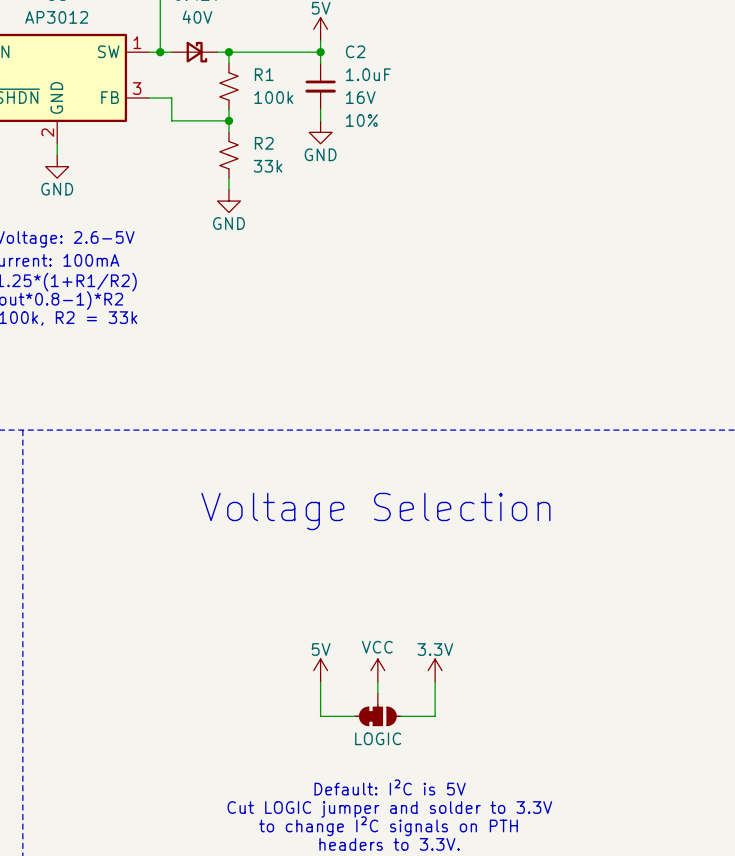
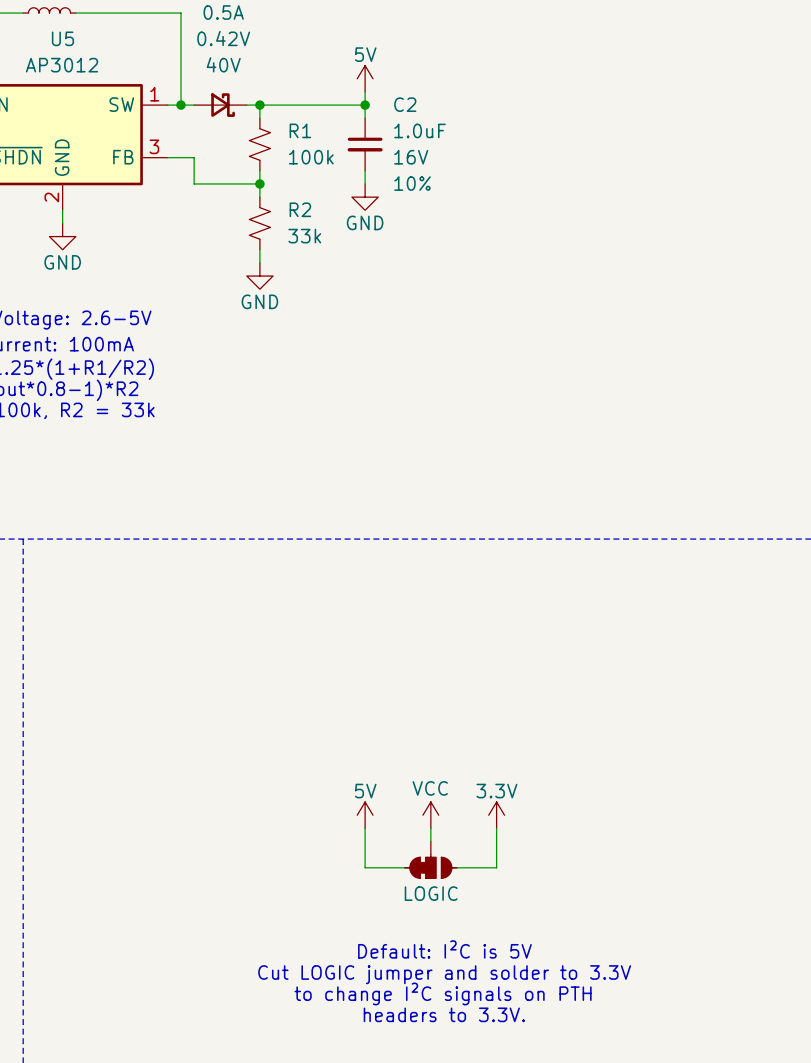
text: Voltage Selection (375, 511) -> none

